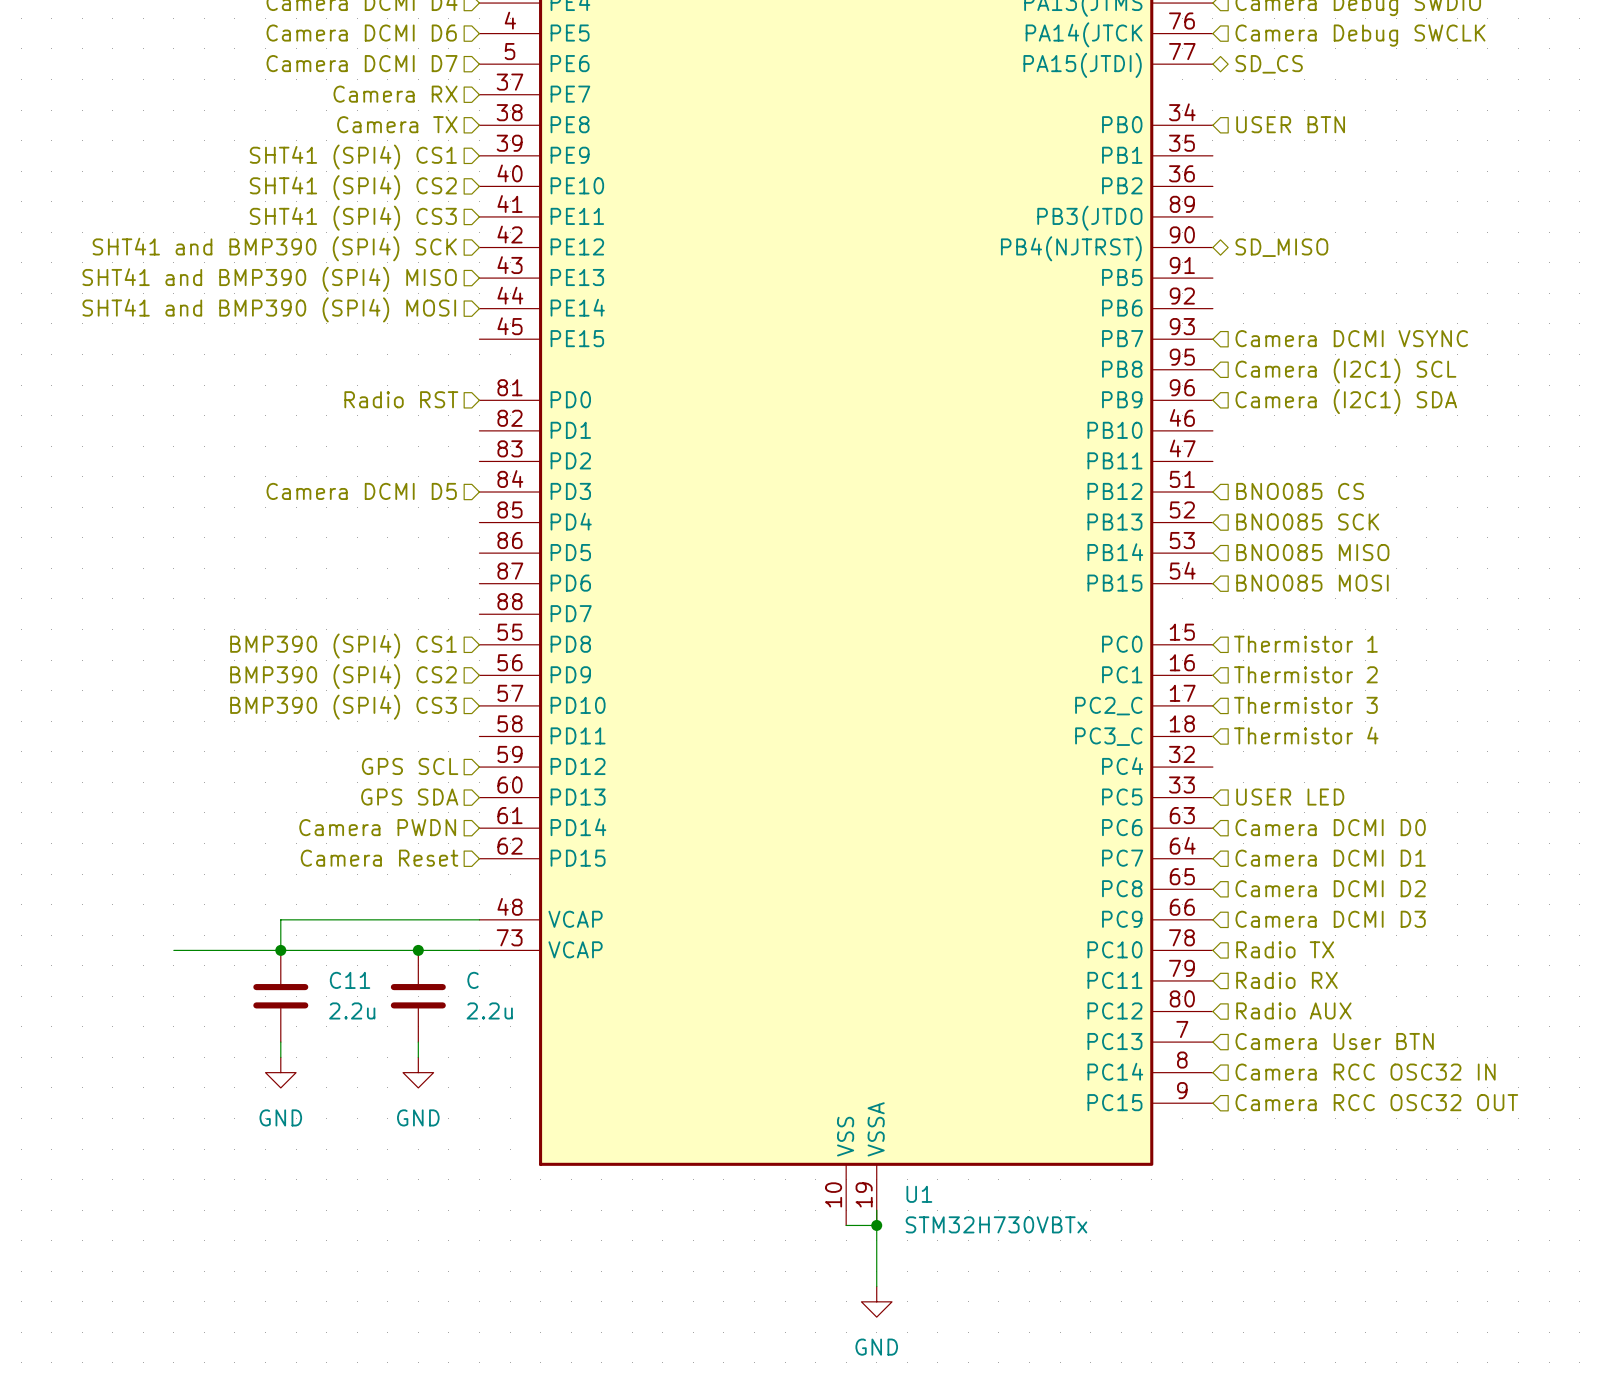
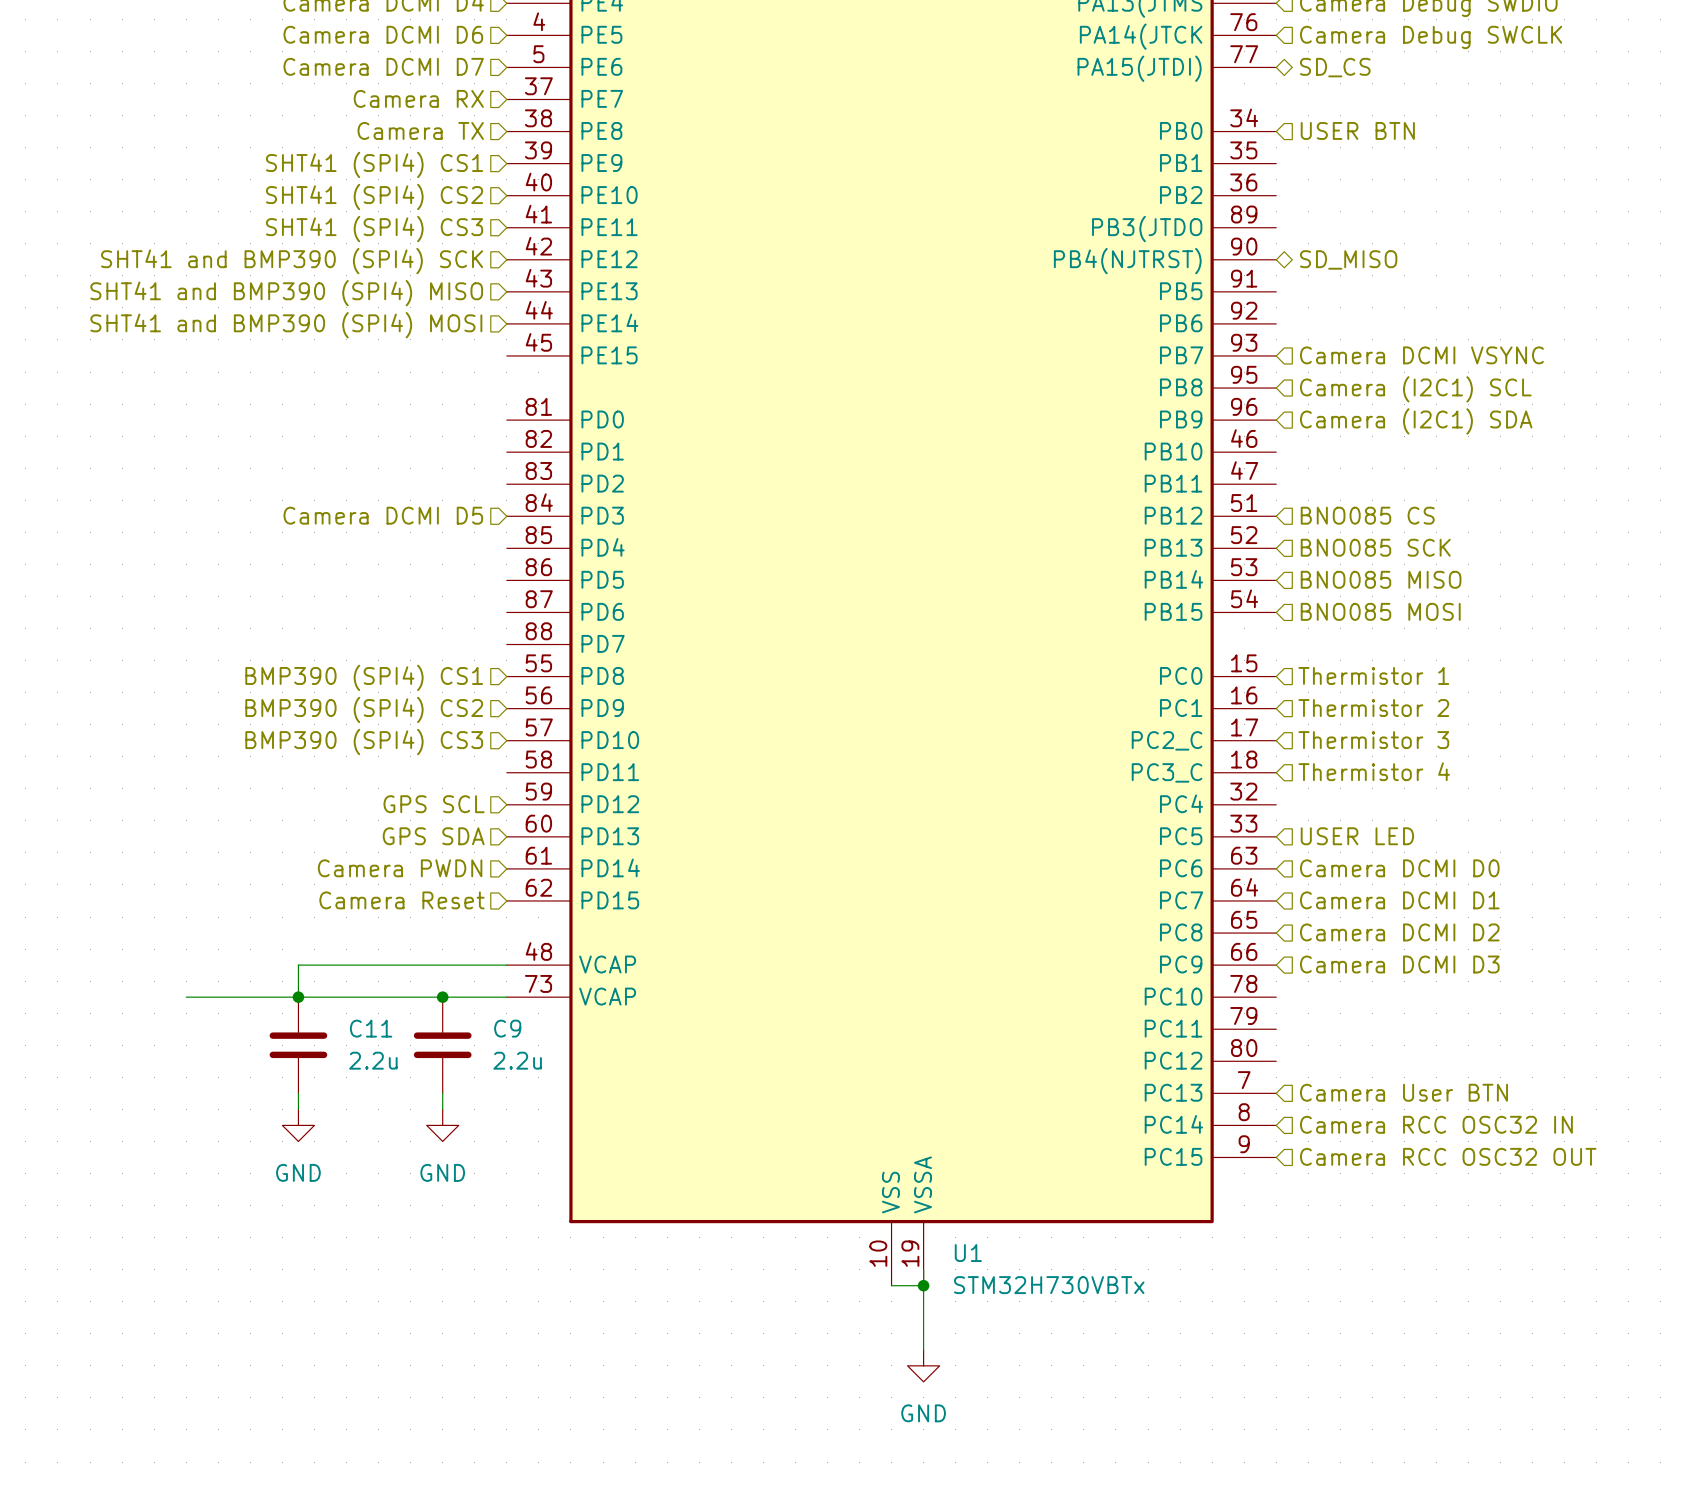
hierarchical label: Radio RST (401, 399) -> none
hierarchical label: Radio TX (1285, 949) -> none
C name: C (473, 980) -> C9 (507, 1028)
hierarchical label: Radio RX (1286, 980) -> none
hierarchical label: Radio AUX (1293, 1010) -> none

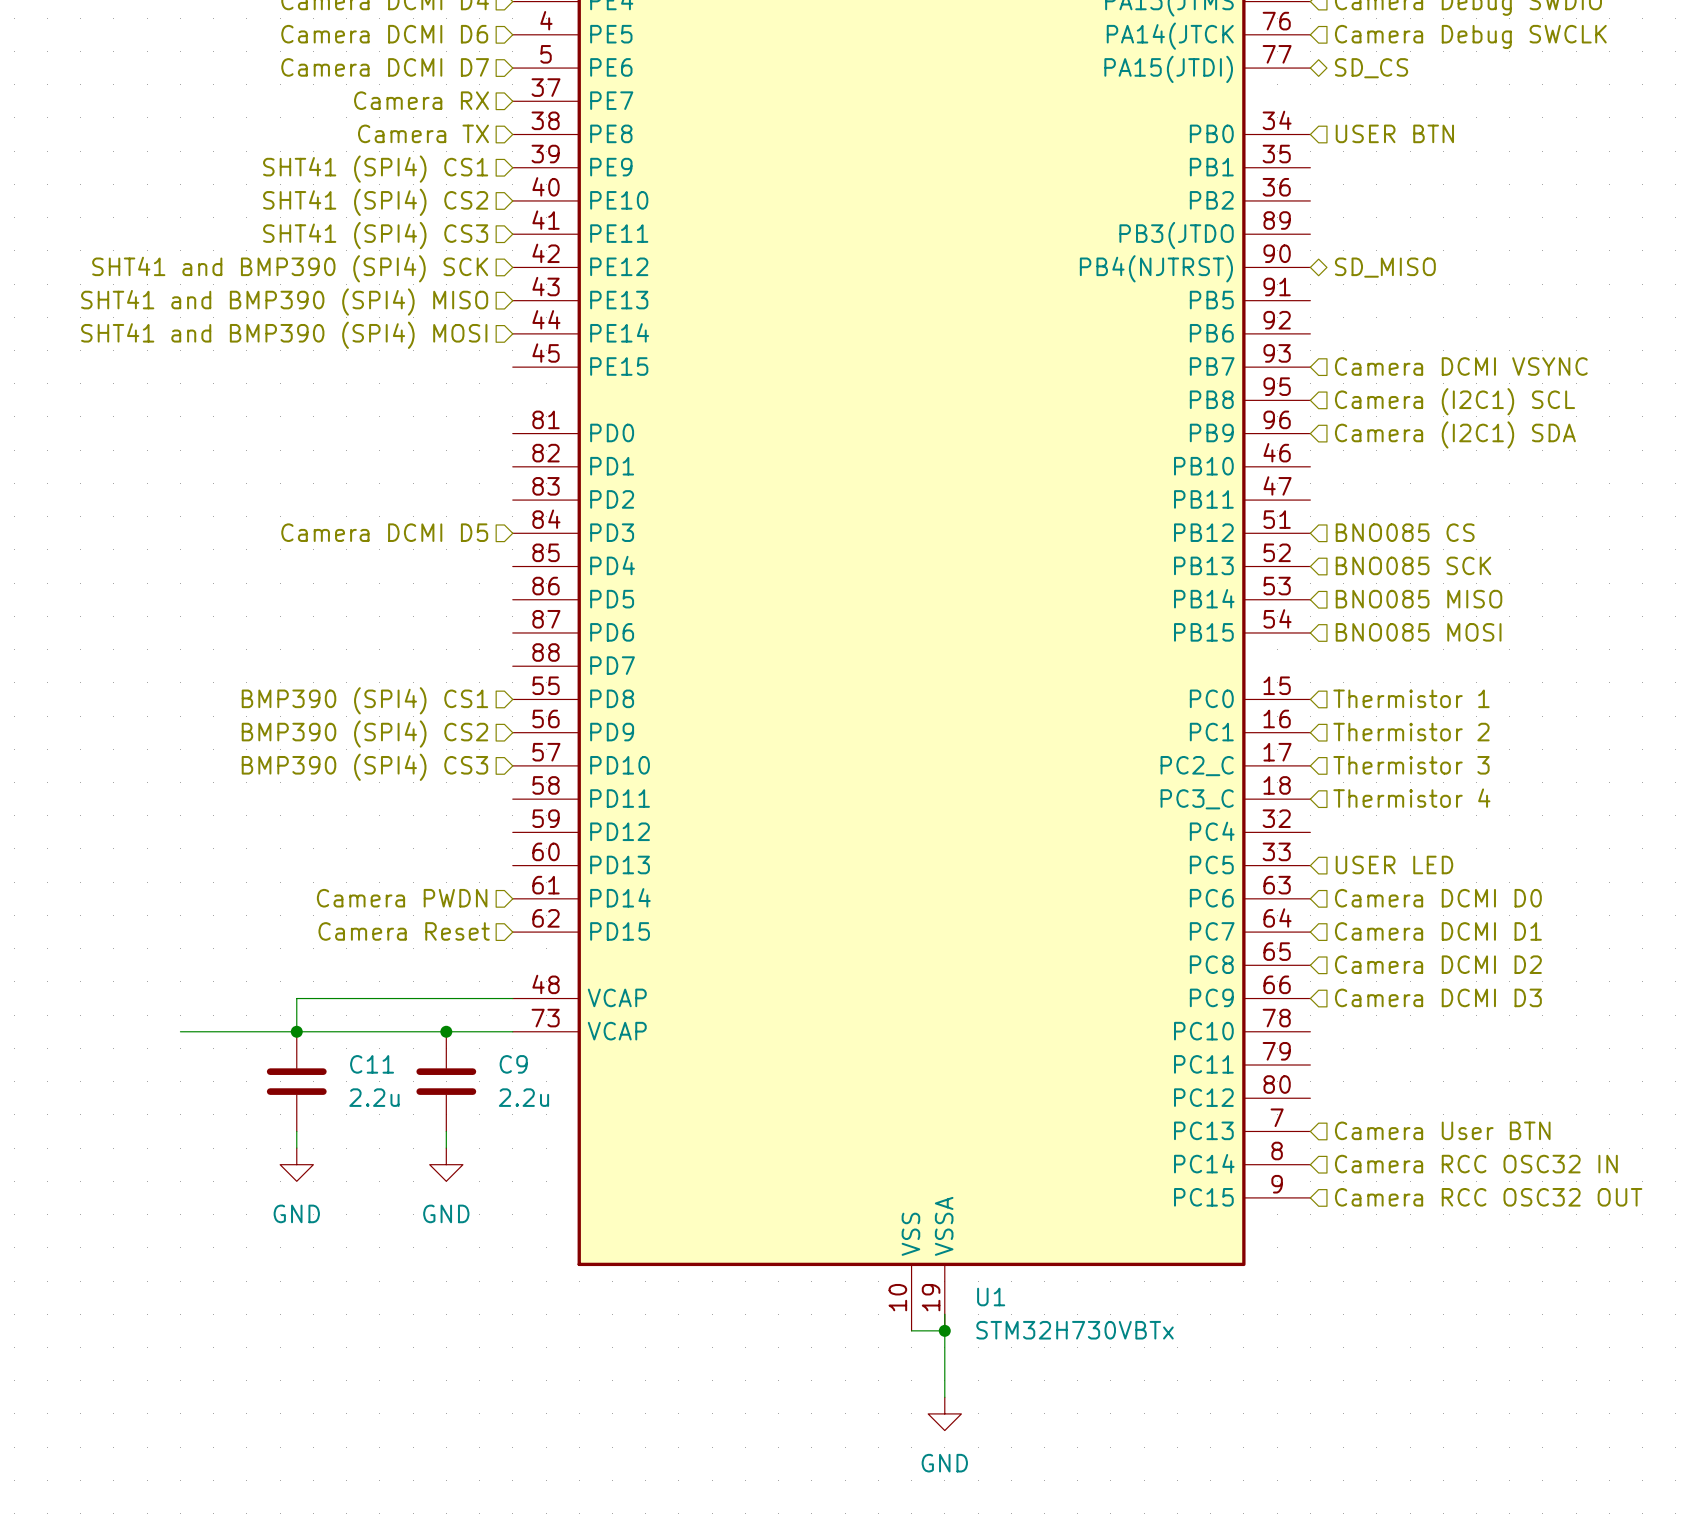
hierarchical label: GPS SCL (434, 804) -> none
hierarchical label: GPS SDA (433, 836) -> none

